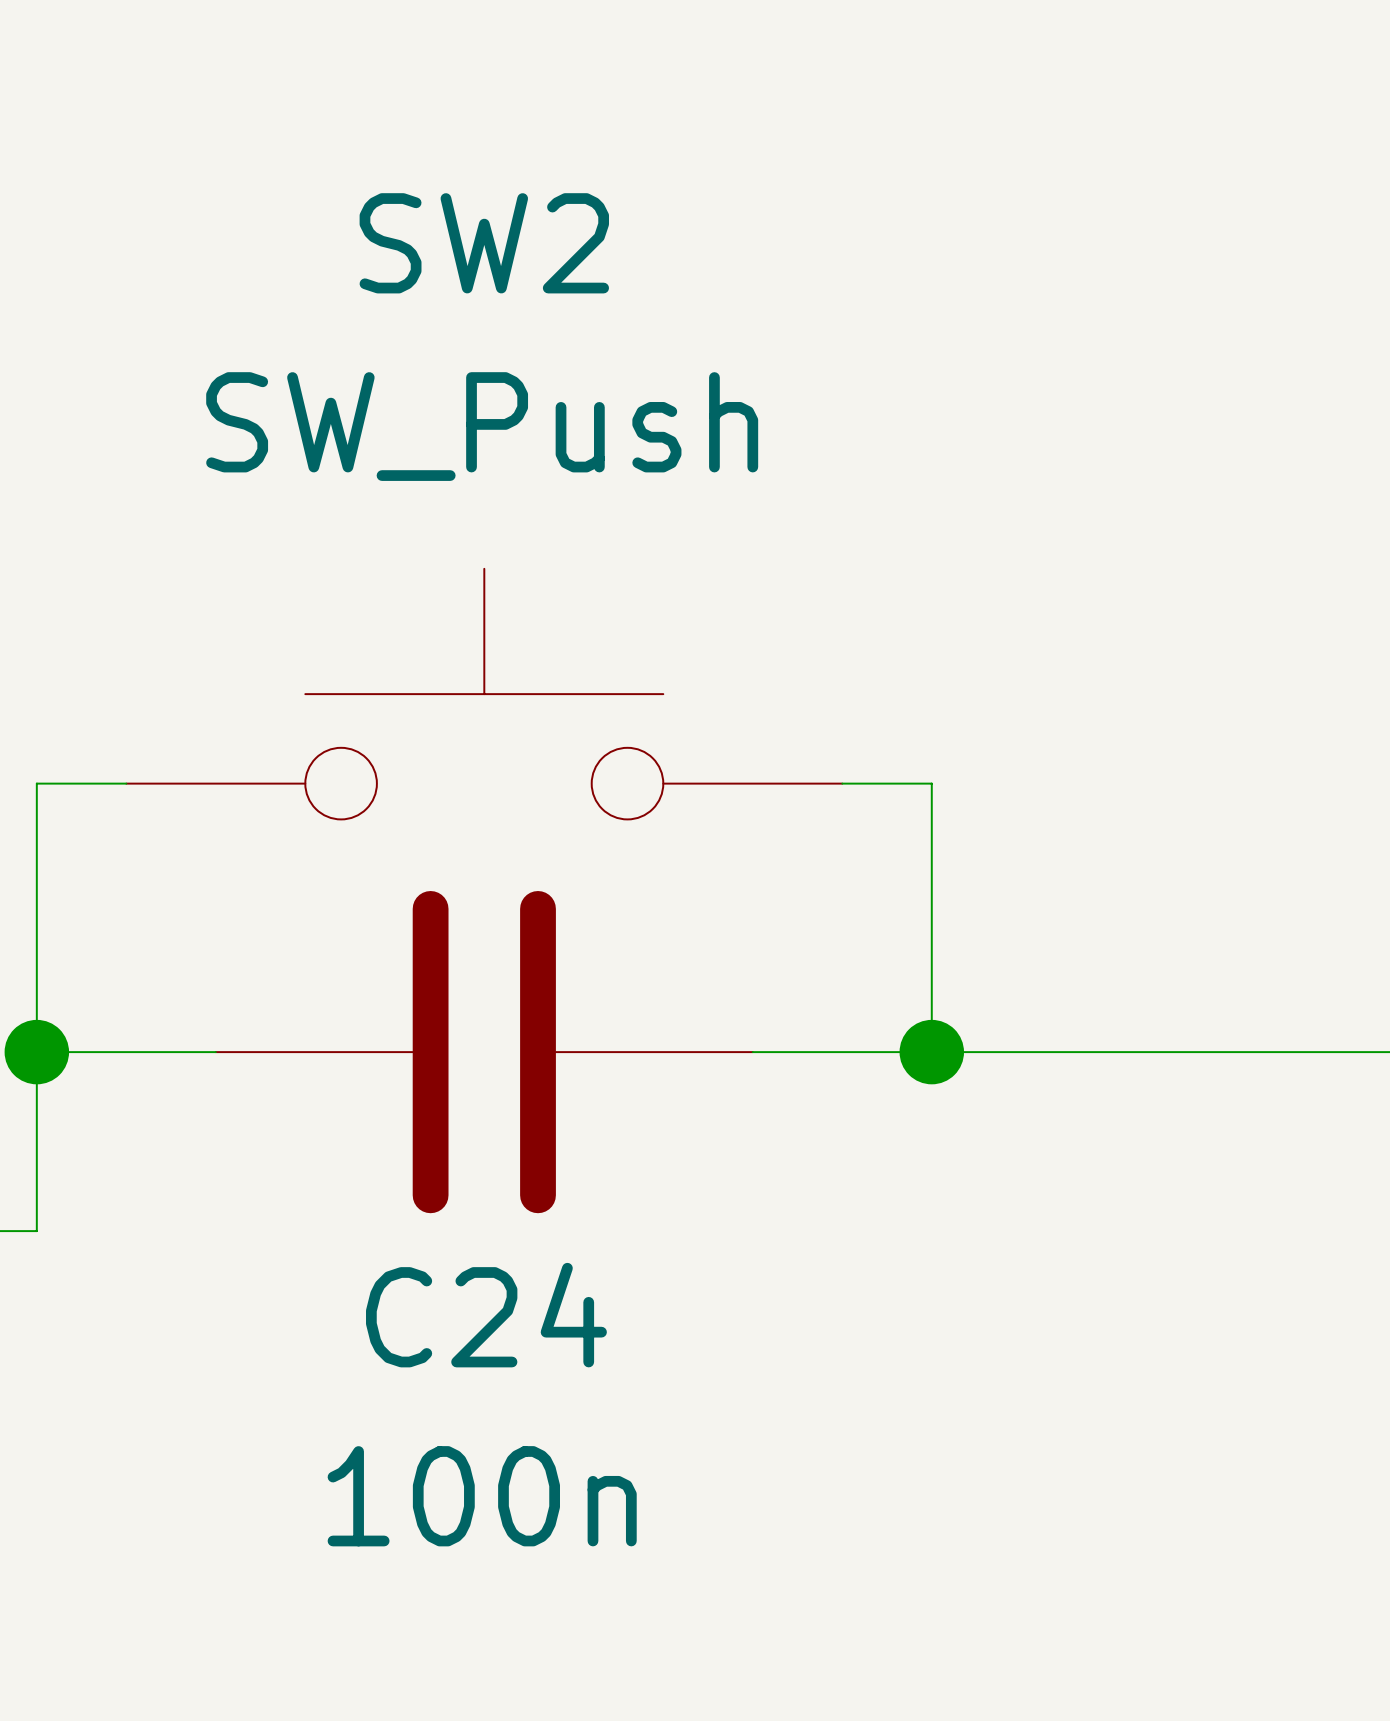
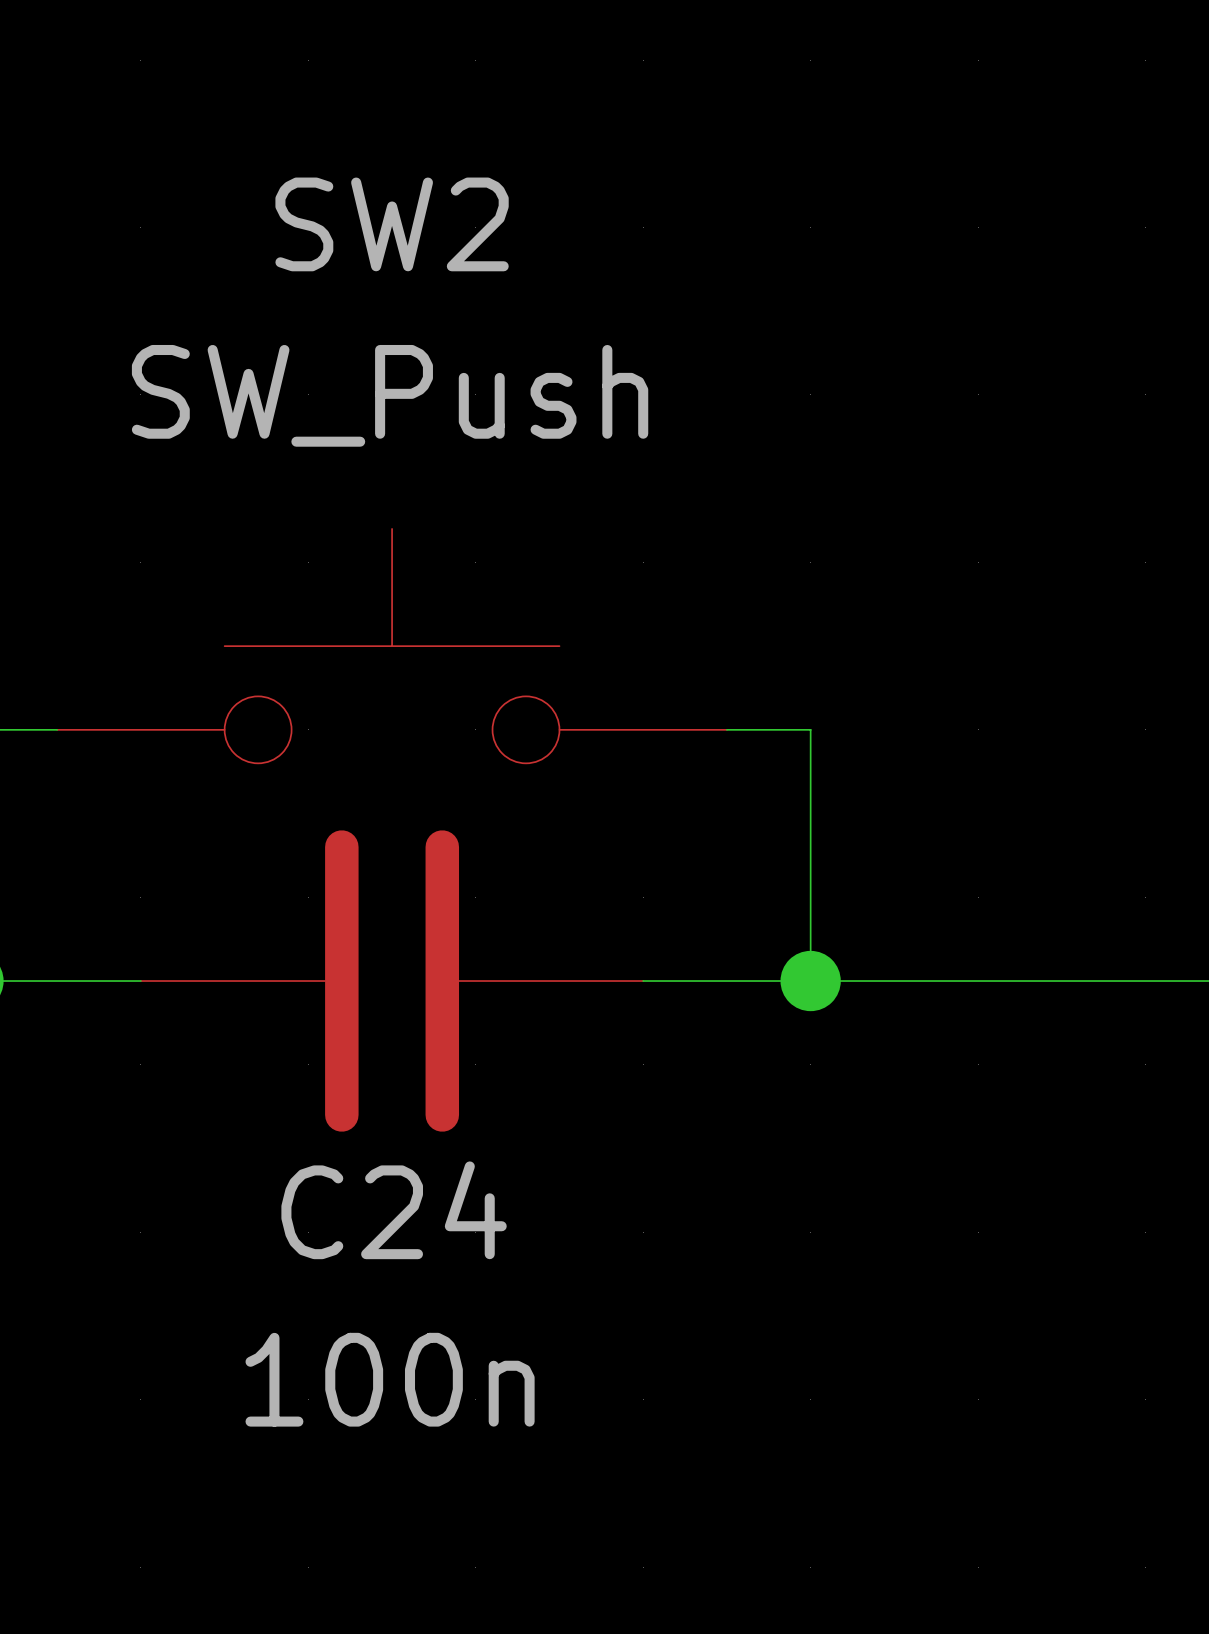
C24 name position: C24 (486, 1315) -> C24 (394, 1210)
C24 value position: 100n (482, 1496) -> 100n (390, 1379)

